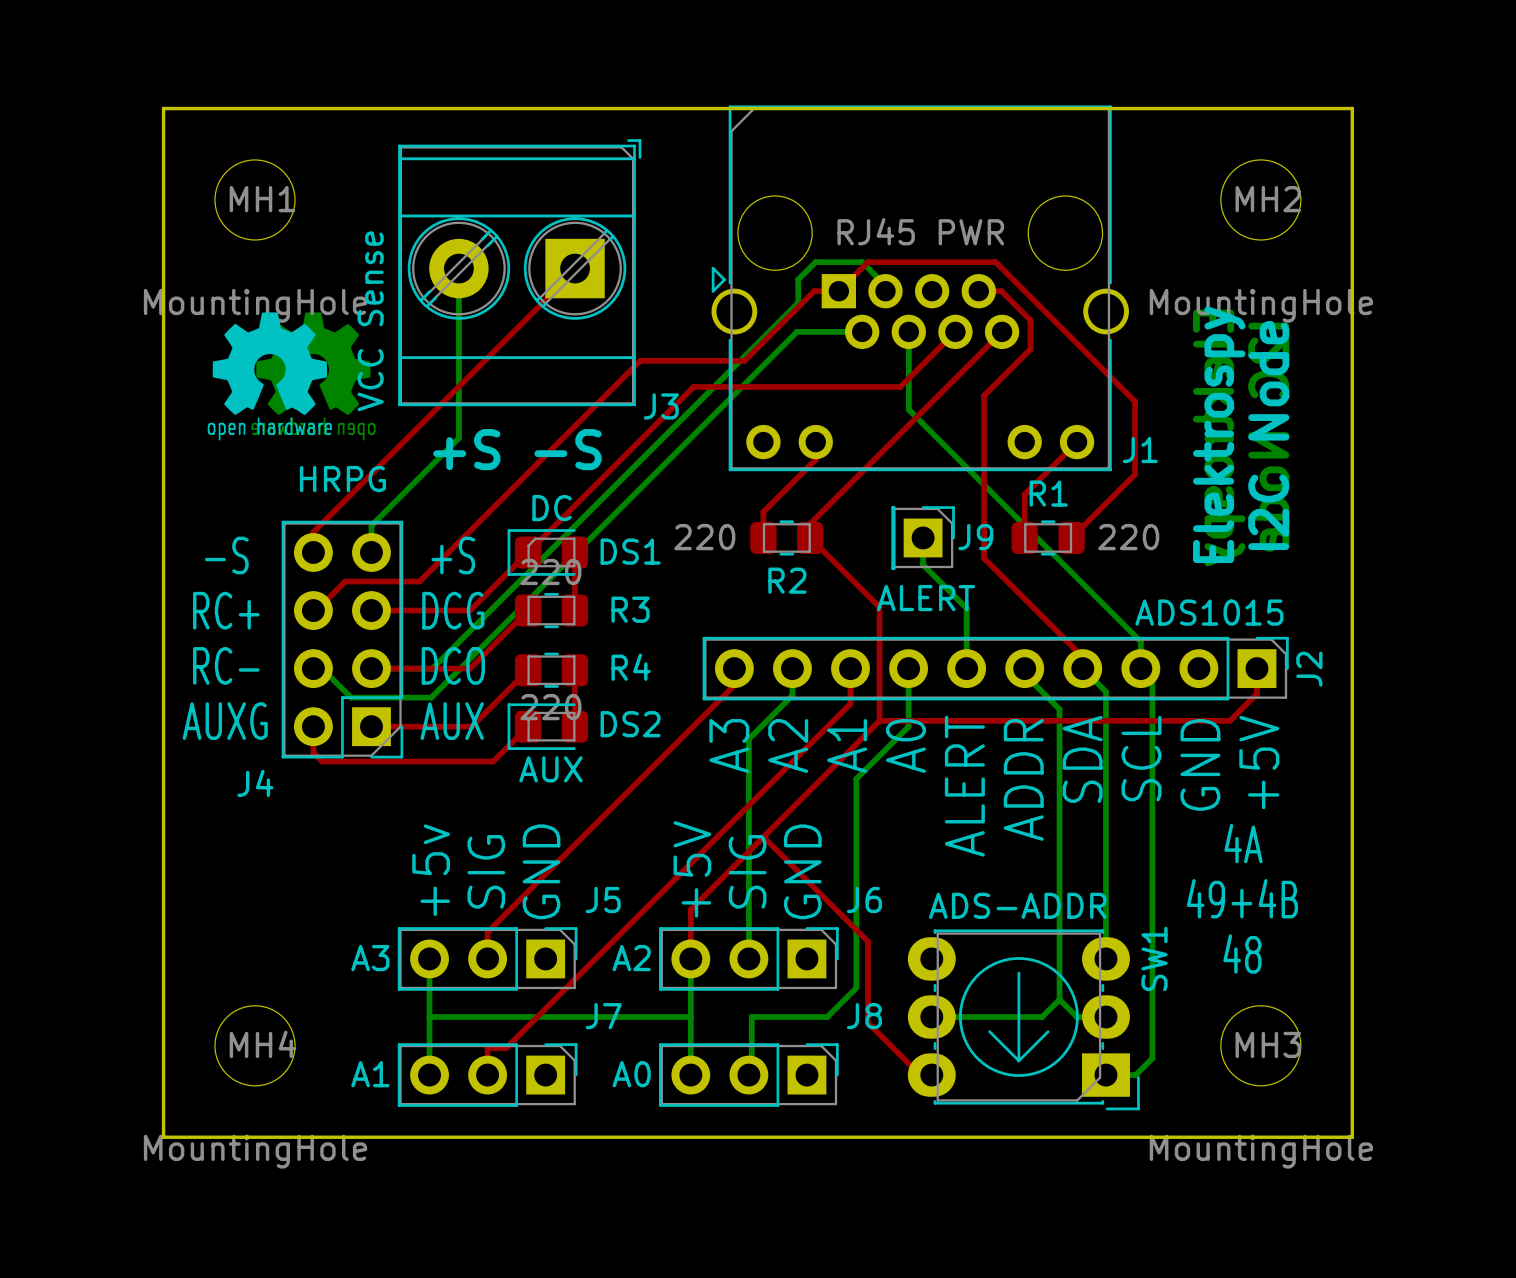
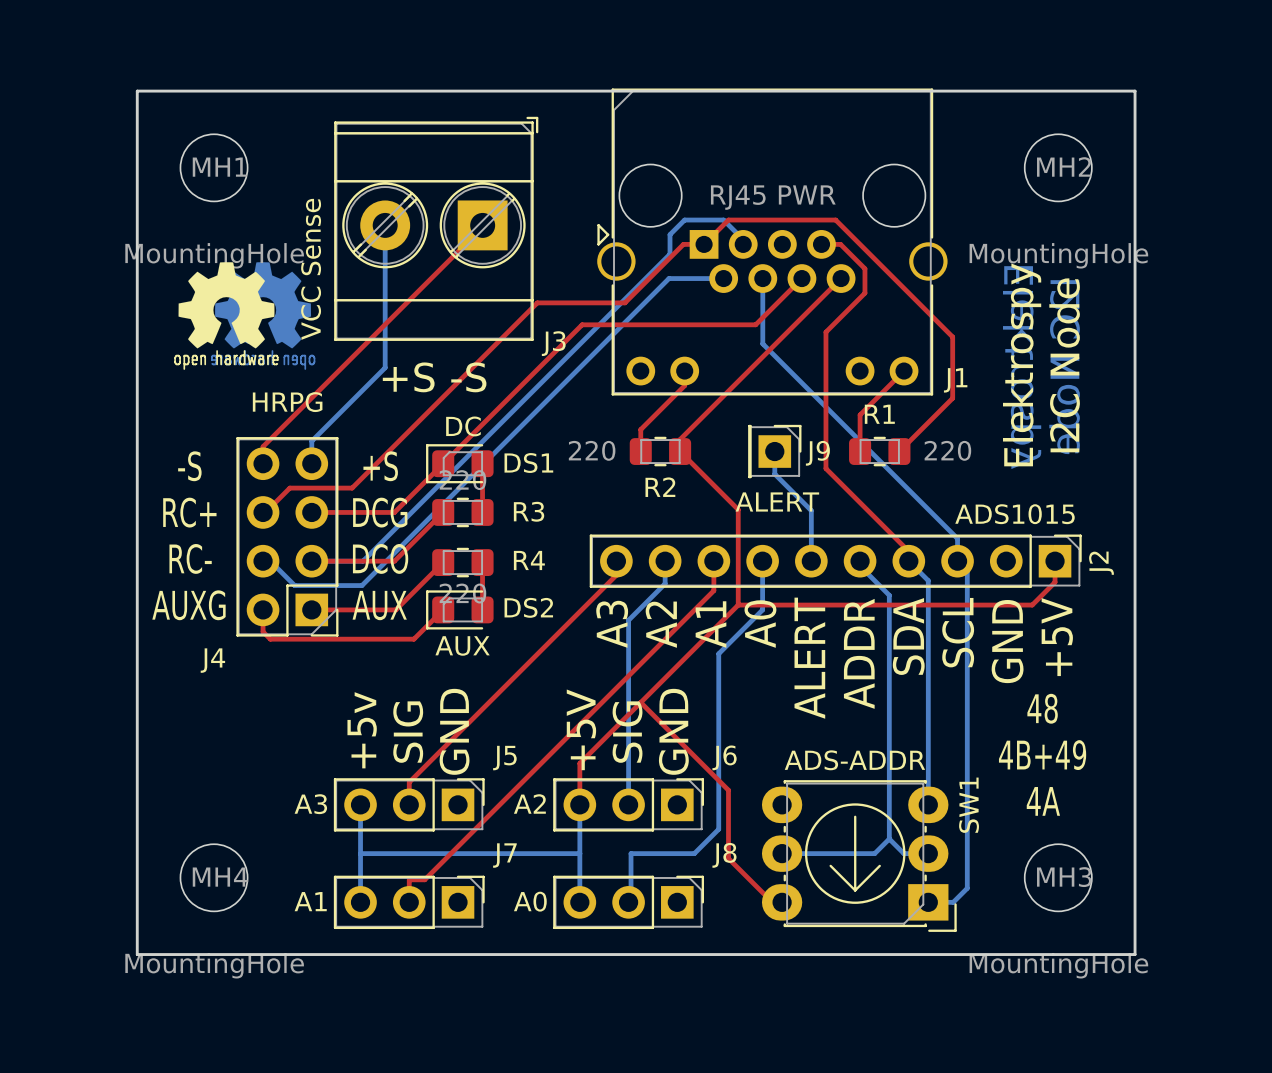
text: 4A (1243, 843) -> 48 (1042, 708)
text: 49+4B (1242, 898) -> 4B+49 (1042, 755)
text: 48 (1242, 953) -> 4A (1043, 801)

